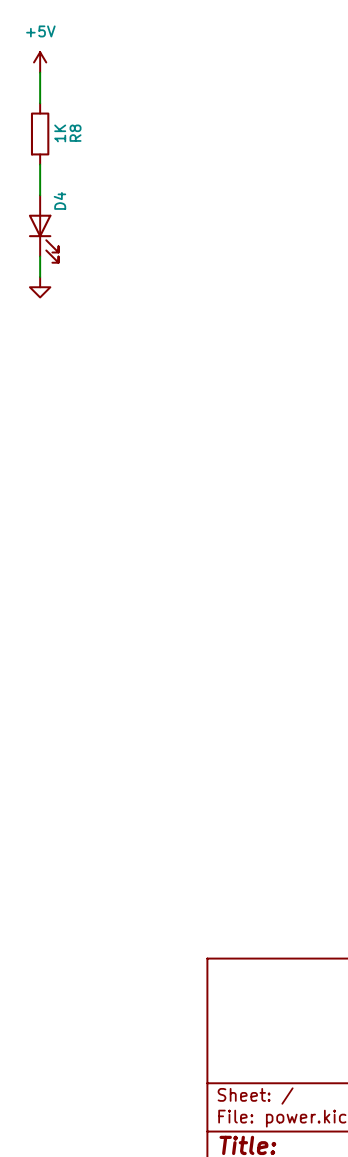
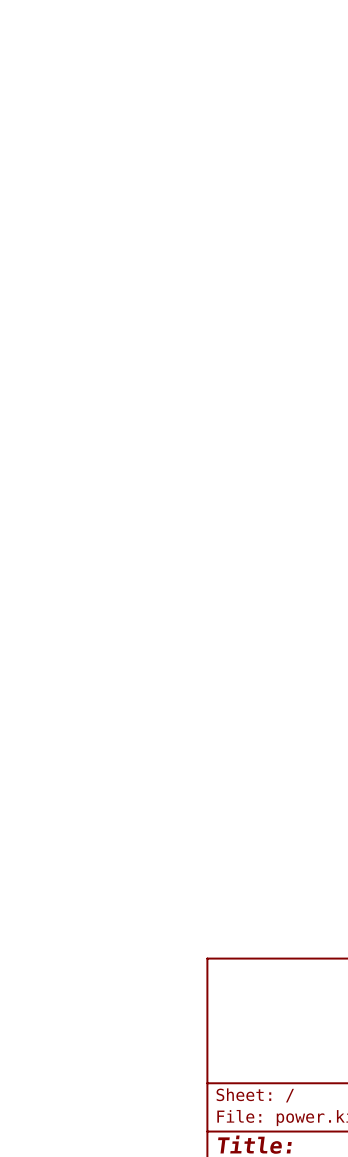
power symbol: +5V (40, 62) -> none
wire: (40, 72) (40, 103) -> none
R8: 1K (40, 133) -> none
wire: (40, 164) (40, 195) -> none
D4: (43, 229) -> none
wire: (40, 256) (40, 277) -> none
power symbol: (40, 287) -> none

